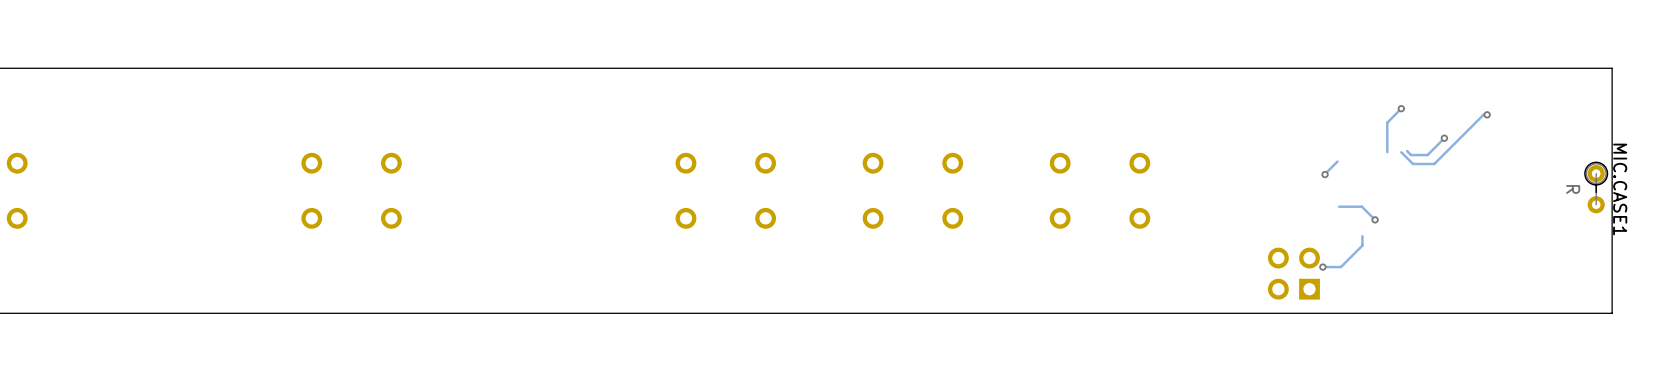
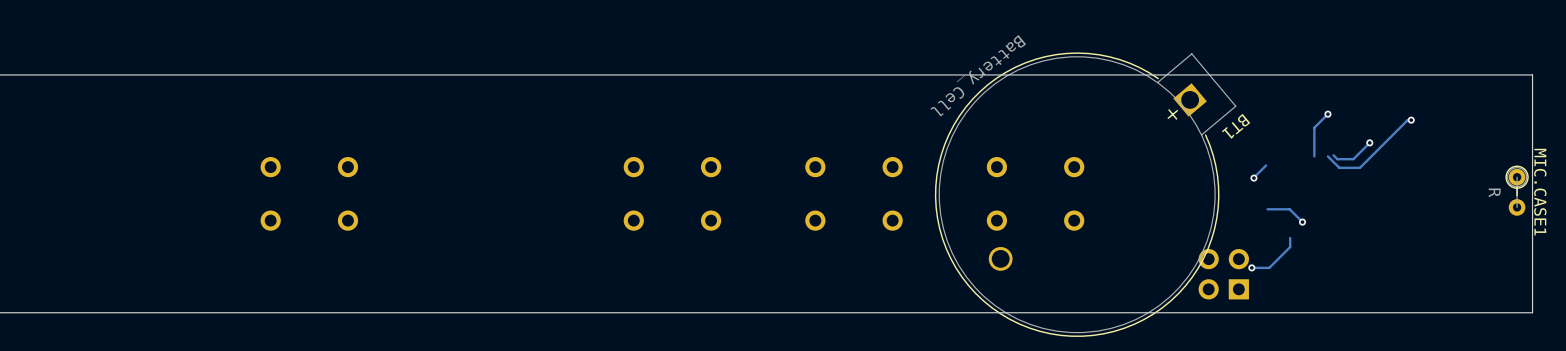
BT1: none -> Battery_Cell (1085, 194)

